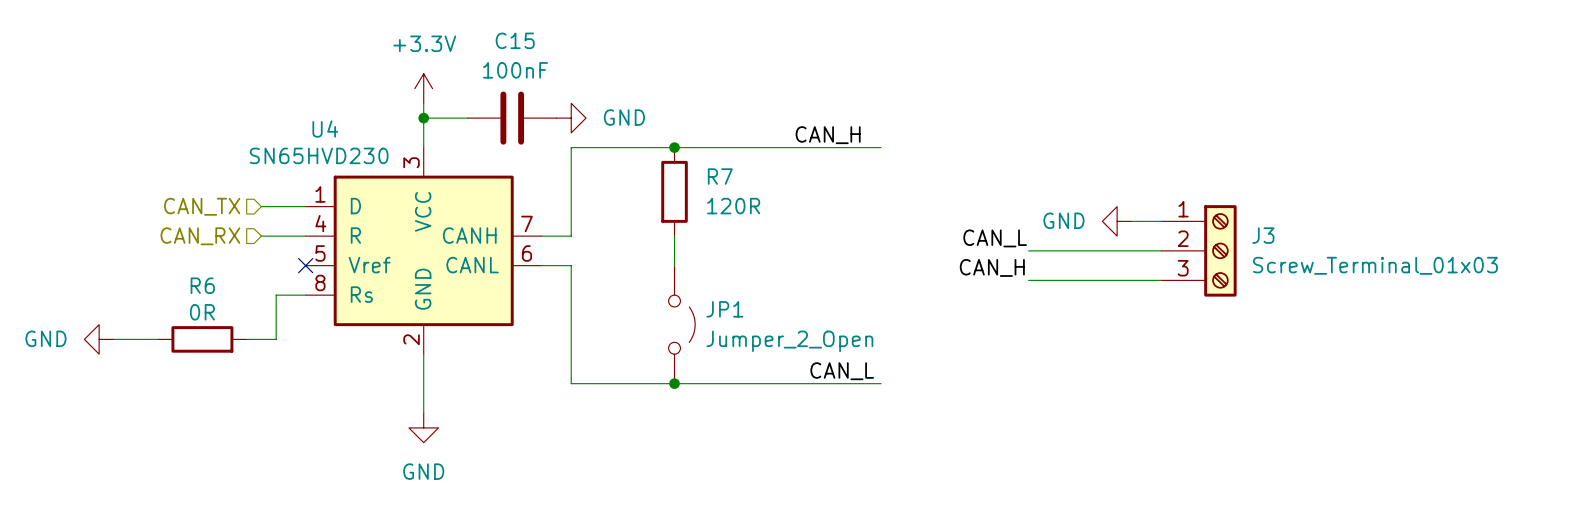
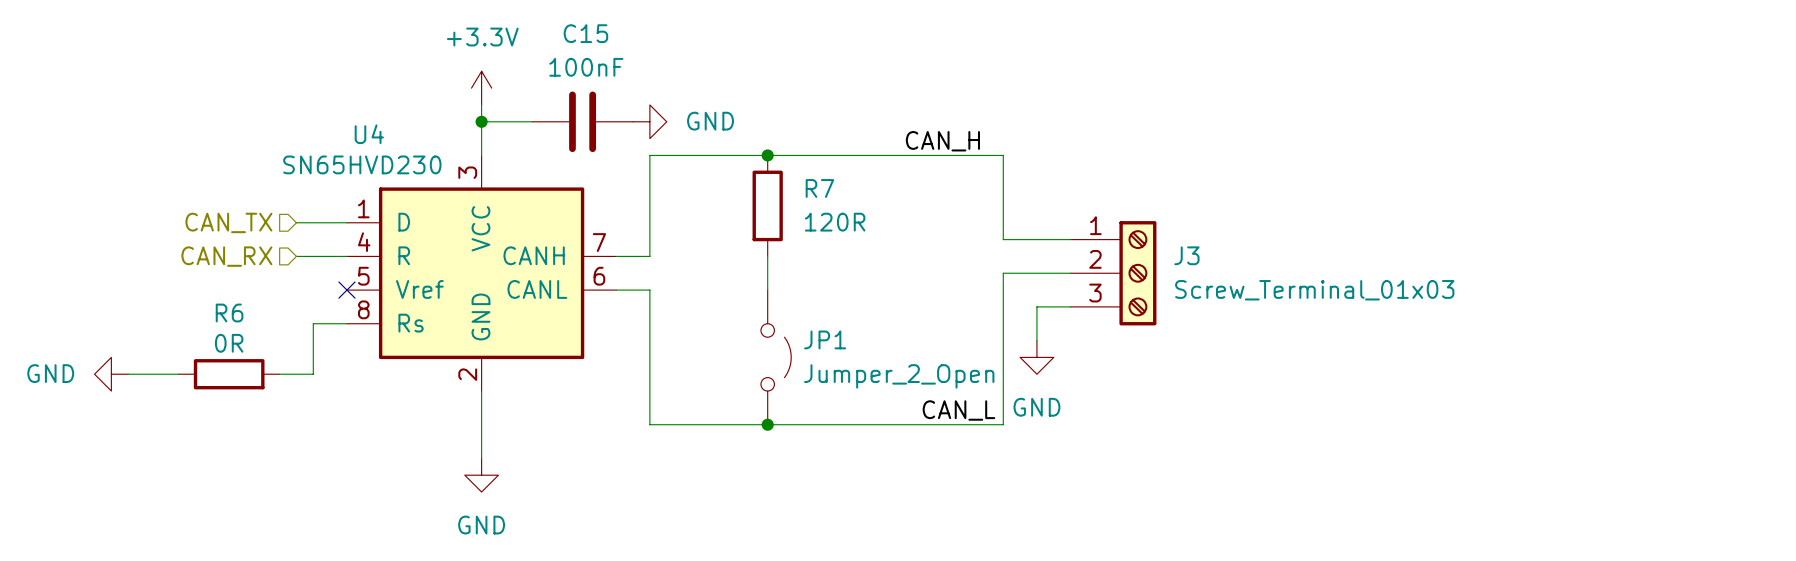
wire: none -> (1003, 155) (1003, 239) (1070, 239)
power symbol rotation: 0° (1117, 221) -> 90° counterclockwise (1036, 357)
power symbol position: GND (1117, 221) -> GND (1036, 357)
wire: (1131, 221) (1161, 221) -> none
label: CAN_L (995, 238) -> none
wire: none -> (1070, 273) (1003, 273) (1003, 424)
wire: (1028, 250) (1161, 250) -> none
J3 position: (1199, 250) -> (1113, 273)
label: CAN_H (992, 267) -> none
wire: none -> (1070, 306) (1036, 306) (1036, 340)
wire: (1028, 280) (1161, 280) -> none

